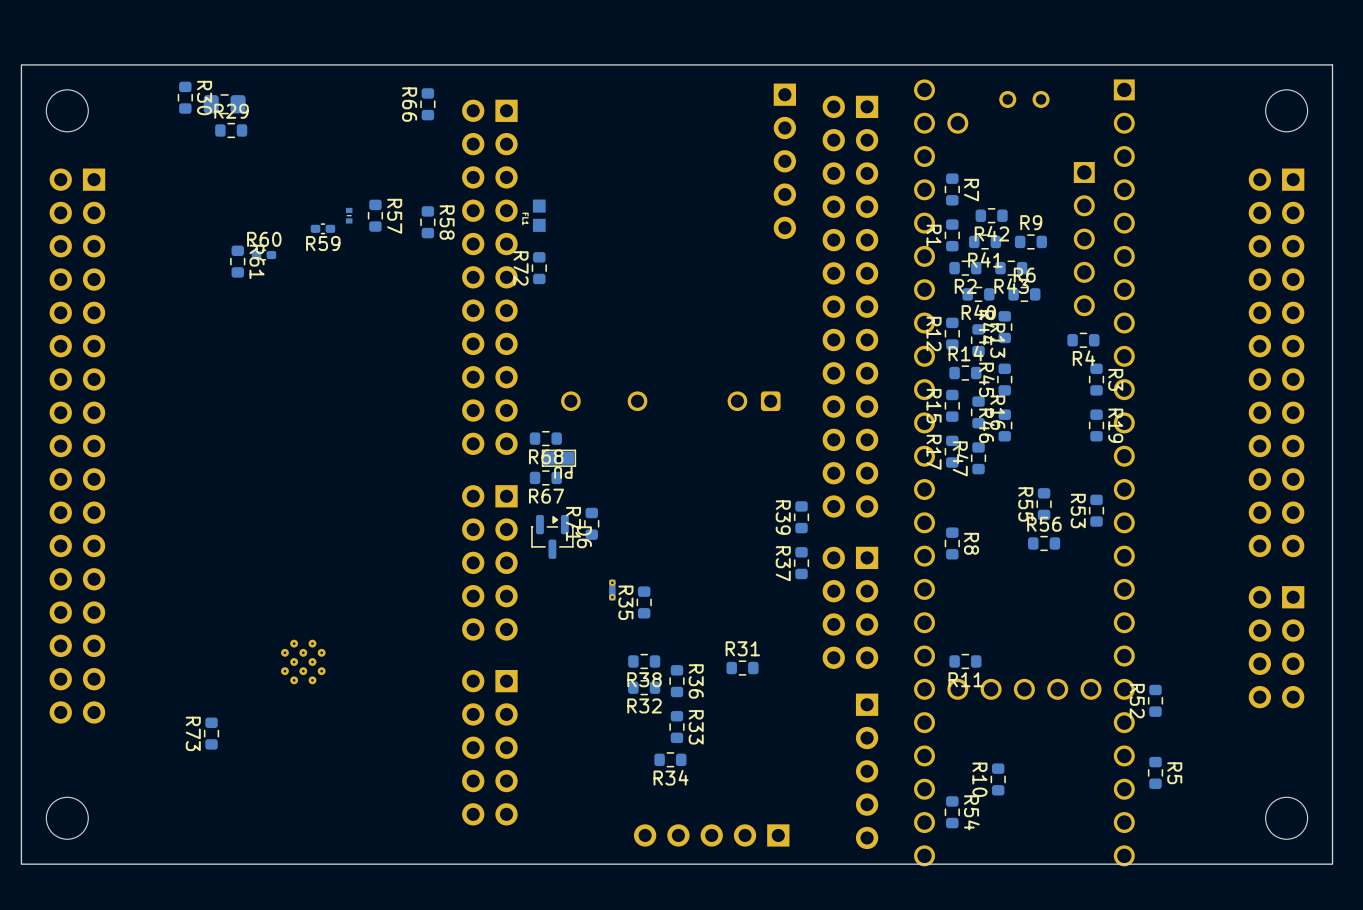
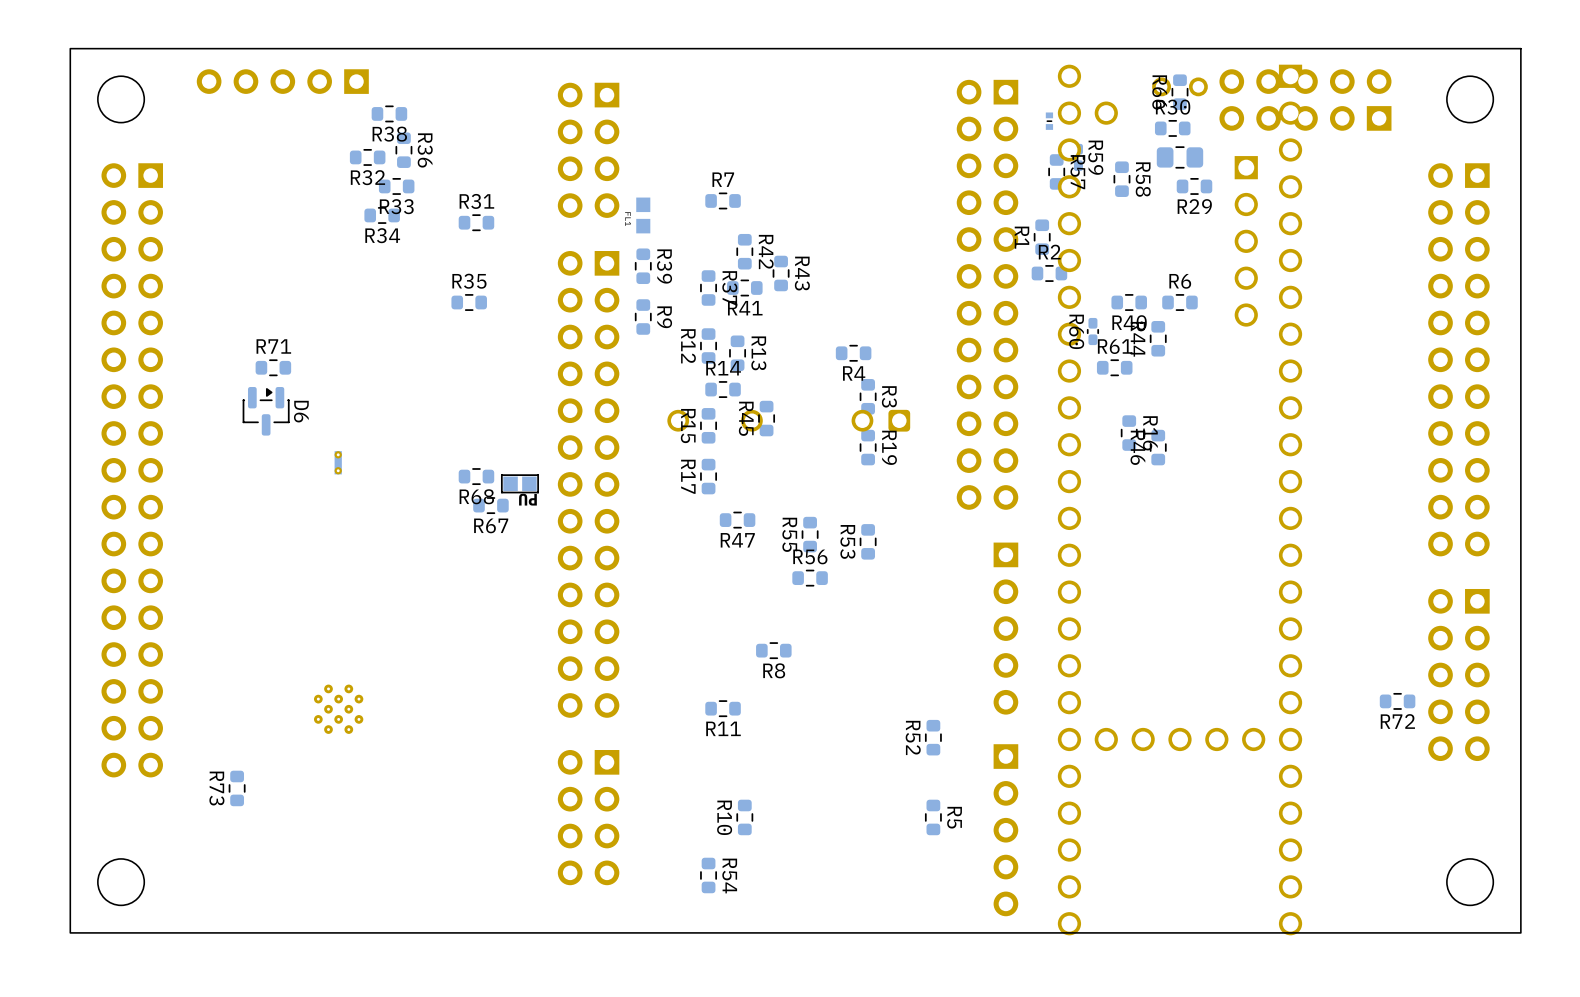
part: none -> (282, 81)
R30 rotation: 0° (185, 97) -> 90° clockwise (1172, 128)
R30 position: (185, 97) -> (1172, 128)
R30 name position: R30 (204, 98) -> R30 (1173, 107)
part: (224, 104) -> none
R66 position: (427, 104) -> (1179, 92)
R29 name position: R29 (231, 111) -> R29 (1194, 206)
part: none -> (1305, 100)
R29 position: (231, 130) -> (1194, 186)
part: none -> (1049, 121)
part: none -> (588, 150)
part: (784, 161) -> none
part: none -> (1179, 157)
R7 rotation: 0° (952, 189) -> 90° clockwise (723, 200)
R7 position: (952, 189) -> (723, 200)
R7 name position: R7 (971, 190) -> R7 (723, 179)
part: (349, 215) -> none
R57 position: (375, 215) -> (1056, 171)
R42 rotation: 0° (991, 215) -> 90° clockwise (744, 251)
R42 position: (991, 215) -> (744, 251)
R58 position: (427, 222) -> (1121, 179)
R59 rotation: 0° (322, 228) -> 90° clockwise (1078, 157)
R59 position: (322, 228) -> (1078, 157)
R42 name position: R42 (991, 233) -> R42 (766, 252)
R1 position: (952, 235) -> (1042, 237)
R41 position: (985, 241) -> (744, 287)
R9 rotation: 0° (1030, 241) -> 90° clockwise (643, 317)
R9 position: (1030, 241) -> (643, 317)
R60 rotation: 0° (263, 255) -> 90° clockwise (1092, 331)
R60 position: (263, 255) -> (1092, 331)
R61 rotation: 0° (237, 261) -> 90° clockwise (1114, 367)
R61 position: (237, 261) -> (1114, 367)
R61 name position: R61 (256, 261) -> R61 (1115, 346)
R72 name position: R72 (521, 268) -> R72 (1397, 721)
R72 rotation: 0° (539, 268) -> 90° clockwise (1397, 701)
R72 position: (539, 268) -> (1397, 701)
R2 position: (965, 268) -> (1049, 273)
R43 rotation: 0° (1011, 268) -> 90° clockwise (781, 273)
R43 position: (1011, 268) -> (781, 273)
part: (489, 277) -> none
R2 name position: R2 (965, 286) -> R2 (1049, 252)
R43 name position: R43 (1011, 286) -> R43 (802, 273)
part: none -> (987, 294)
part: (850, 306) -> none
R12 position: (952, 333) -> (708, 346)
R13 position: (978, 340) -> (737, 353)
R4 position: (1083, 340) -> (853, 353)
part: (1276, 362) -> none
R14 position: (965, 373) -> (723, 389)
R45 position: (1004, 379) -> (766, 418)
R3 position: (1096, 379) -> (868, 396)
R15 position: (952, 405) -> (708, 425)
R19 position: (1096, 425) -> (868, 447)
R68 position: (545, 438) -> (476, 476)
part: none -> (338, 462)
R17 position: (952, 451) -> (708, 476)
part: none -> (588, 484)
part position: (558, 458) -> (519, 483)
R47 name position: R47 (960, 458) -> R47 (737, 540)
R47 rotation: 0° (978, 458) -> 90° clockwise (737, 520)
R47 position: (978, 458) -> (737, 520)
R67 position: (545, 477) -> (490, 505)
R55 position: (1044, 504) -> (810, 534)
R53 position: (1096, 510) -> (868, 541)
R39 name position: R39 (783, 517) -> R39 (664, 266)
R39 position: (801, 517) -> (643, 266)
R71 rotation: 0° (591, 523) -> 90° clockwise (273, 367)
R71 position: (591, 523) -> (273, 367)
D6 position: (552, 536) -> (266, 411)
R8 rotation: 0° (952, 543) -> 90° clockwise (773, 650)
R8 position: (952, 543) -> (773, 650)
R56 position: (1044, 543) -> (810, 578)
part: (489, 562) -> none
R37 name position: R37 (783, 563) -> R37 (729, 288)
R37 position: (801, 563) -> (708, 287)
part: none -> (1005, 628)
part: (612, 590) -> none
R35 rotation: 0° (644, 602) -> 90° clockwise (469, 302)
R35 position: (644, 602) -> (469, 302)
part: (850, 607) -> none
part: none -> (1458, 675)
part: (1276, 647) -> none
R38 position: (644, 661) -> (389, 113)
R11 position: (965, 661) -> (723, 708)
part position: (303, 662) -> (338, 709)
R31 position: (742, 668) -> (476, 222)
part footprint: [462, 669, 518, 826] -> [557, 750, 620, 886]
R36 position: (676, 681) -> (403, 150)
R32 position: (644, 687) -> (367, 157)
R52 position: (1155, 700) -> (933, 737)
R33 rotation: 0° (676, 727) -> 90° clockwise (396, 186)
R33 position: (676, 727) -> (396, 186)
R73 position: (211, 733) -> (237, 788)
R34 position: (670, 759) -> (382, 215)
R5 position: (1155, 772) -> (933, 817)
R10 position: (998, 779) -> (744, 817)
R54 position: (952, 812) -> (708, 875)
part: (711, 835) -> none

